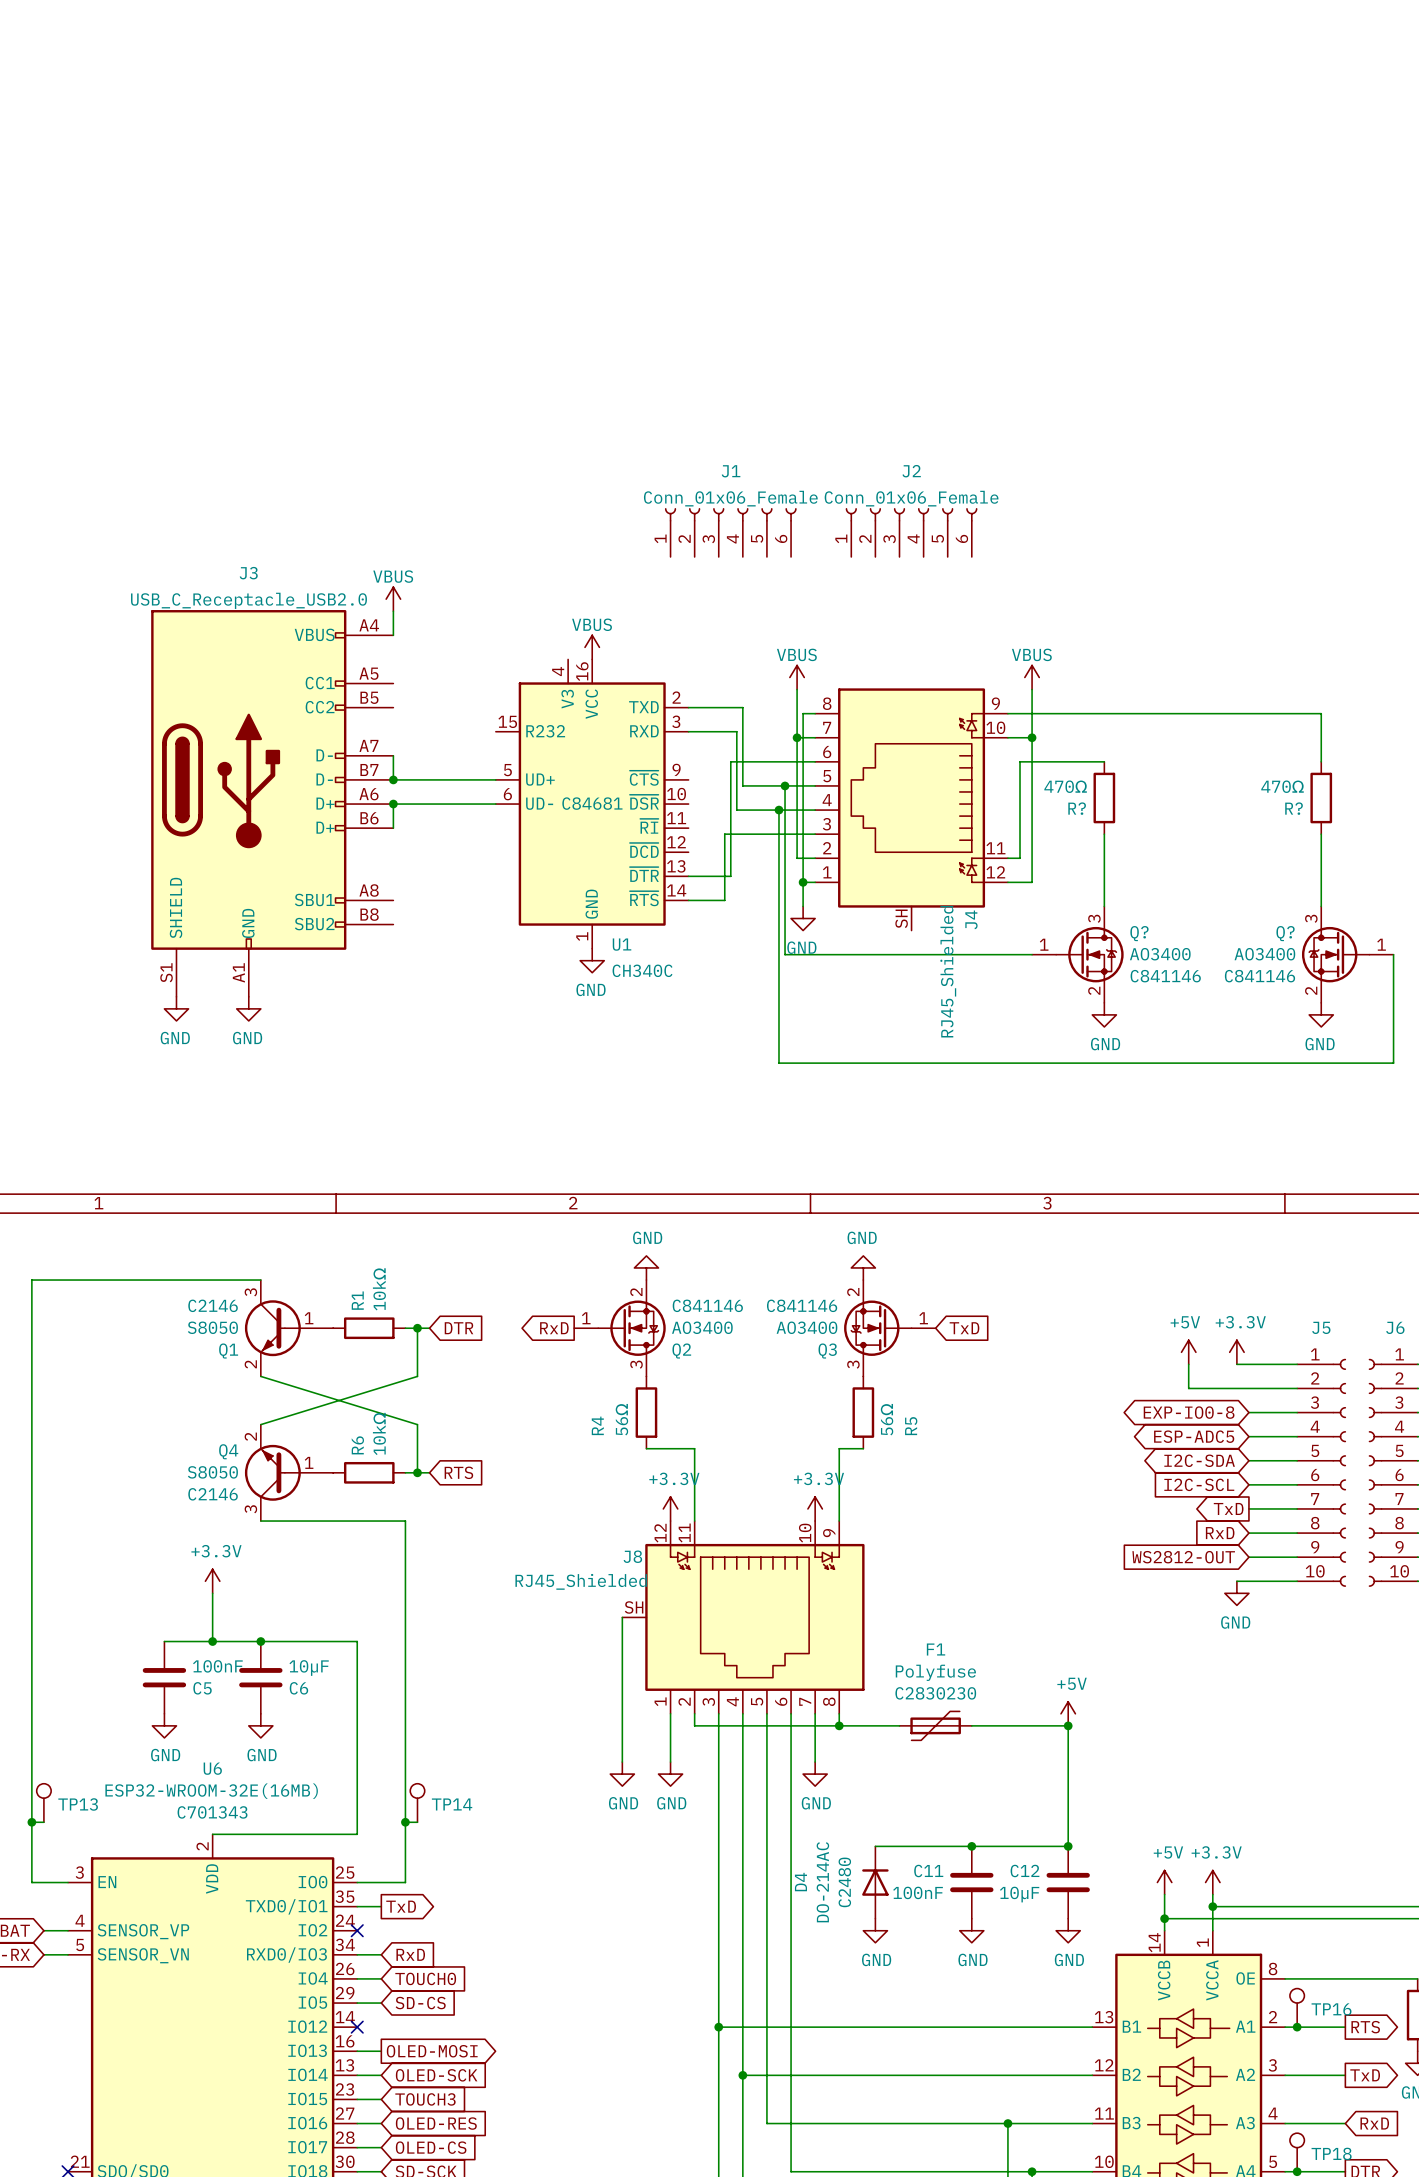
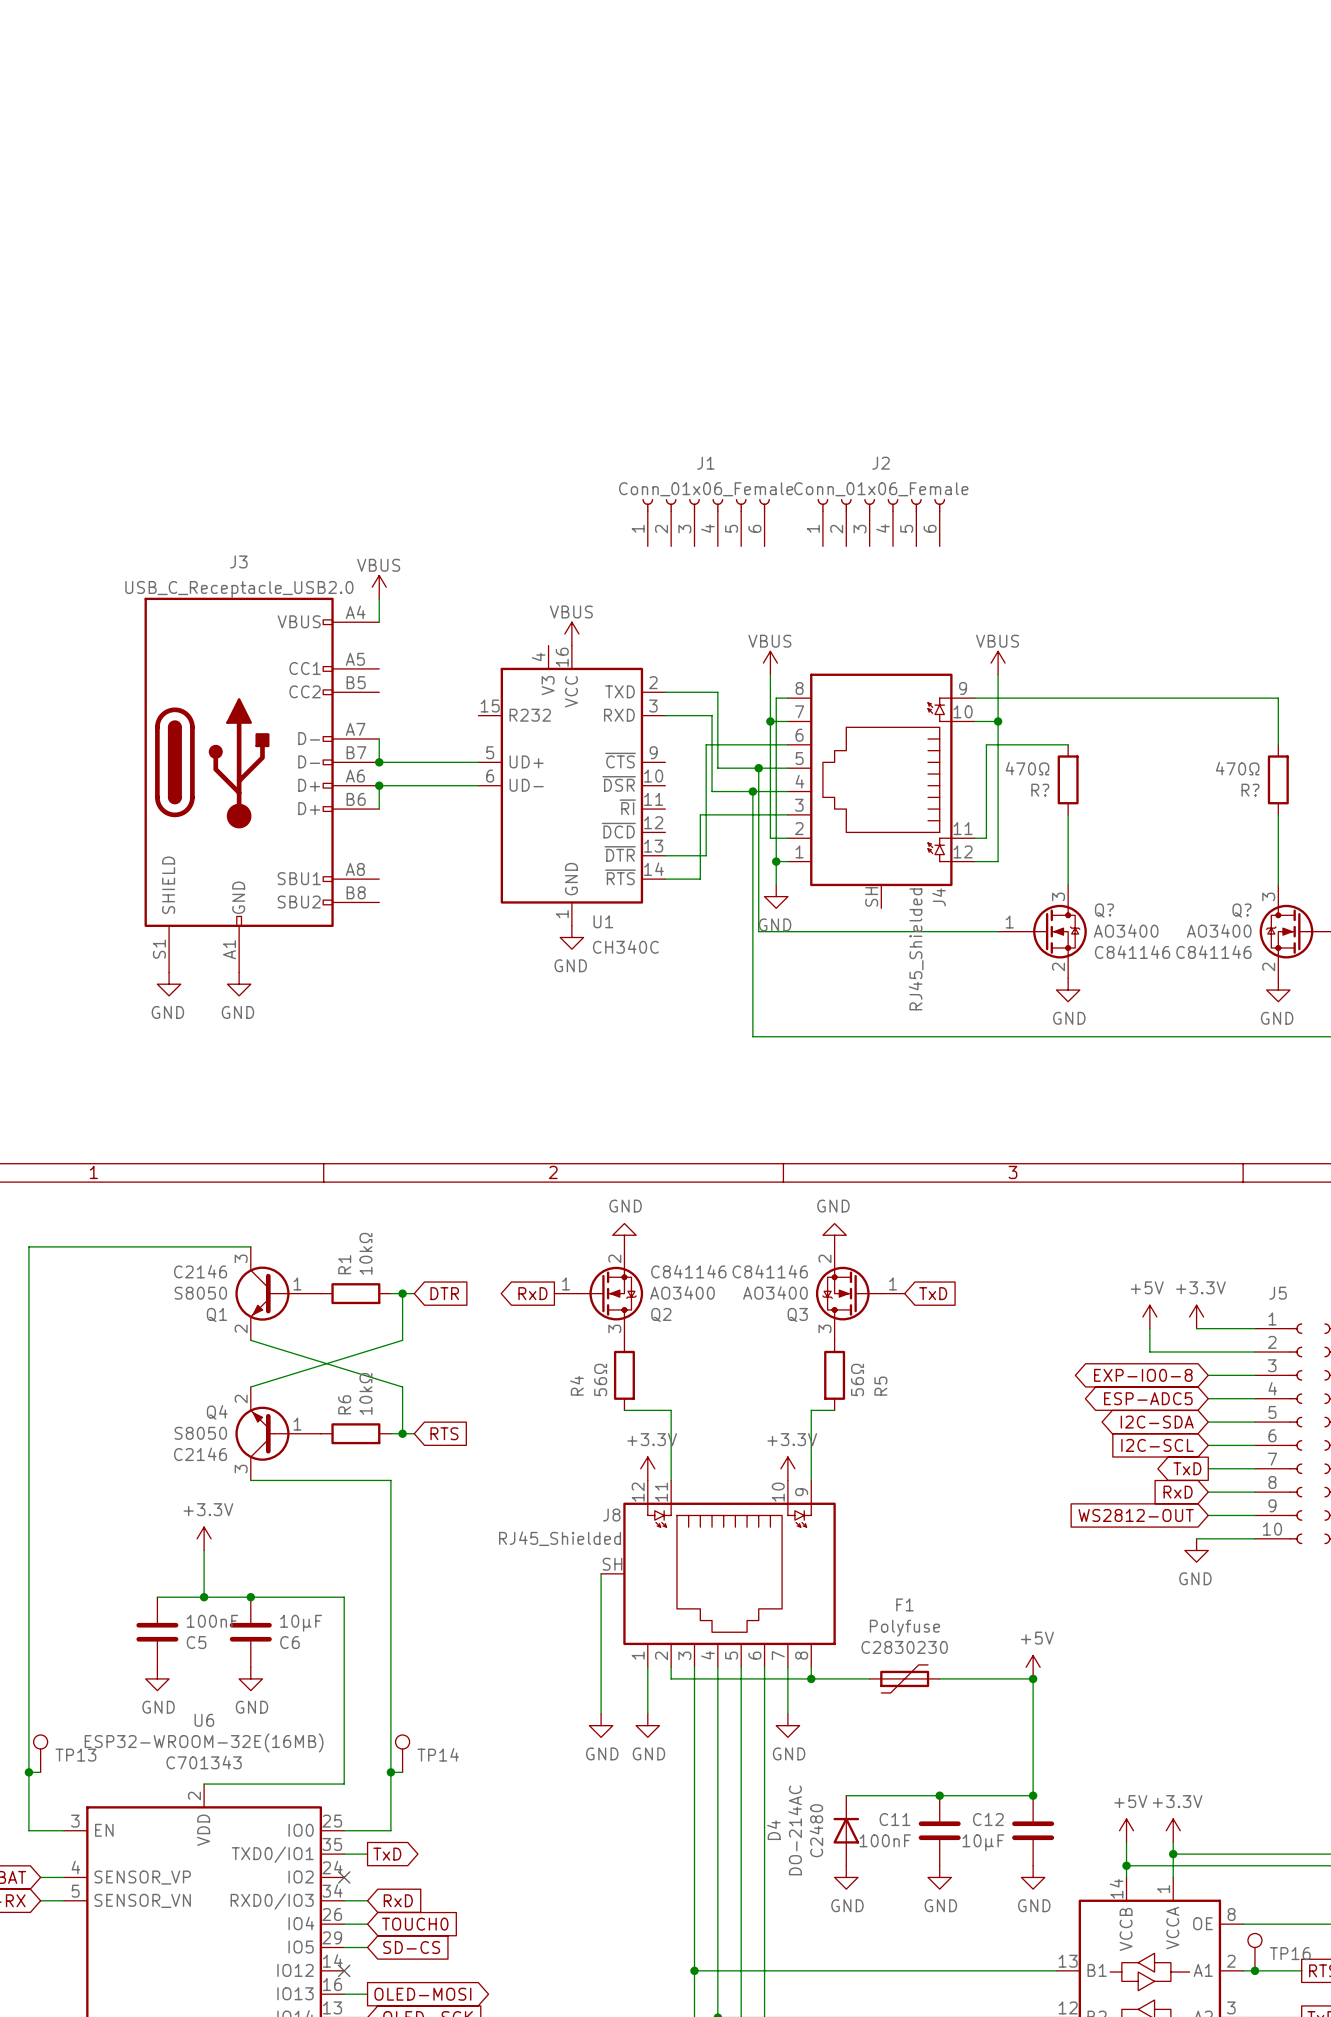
U1 text: C84681 (592, 803) -> none

